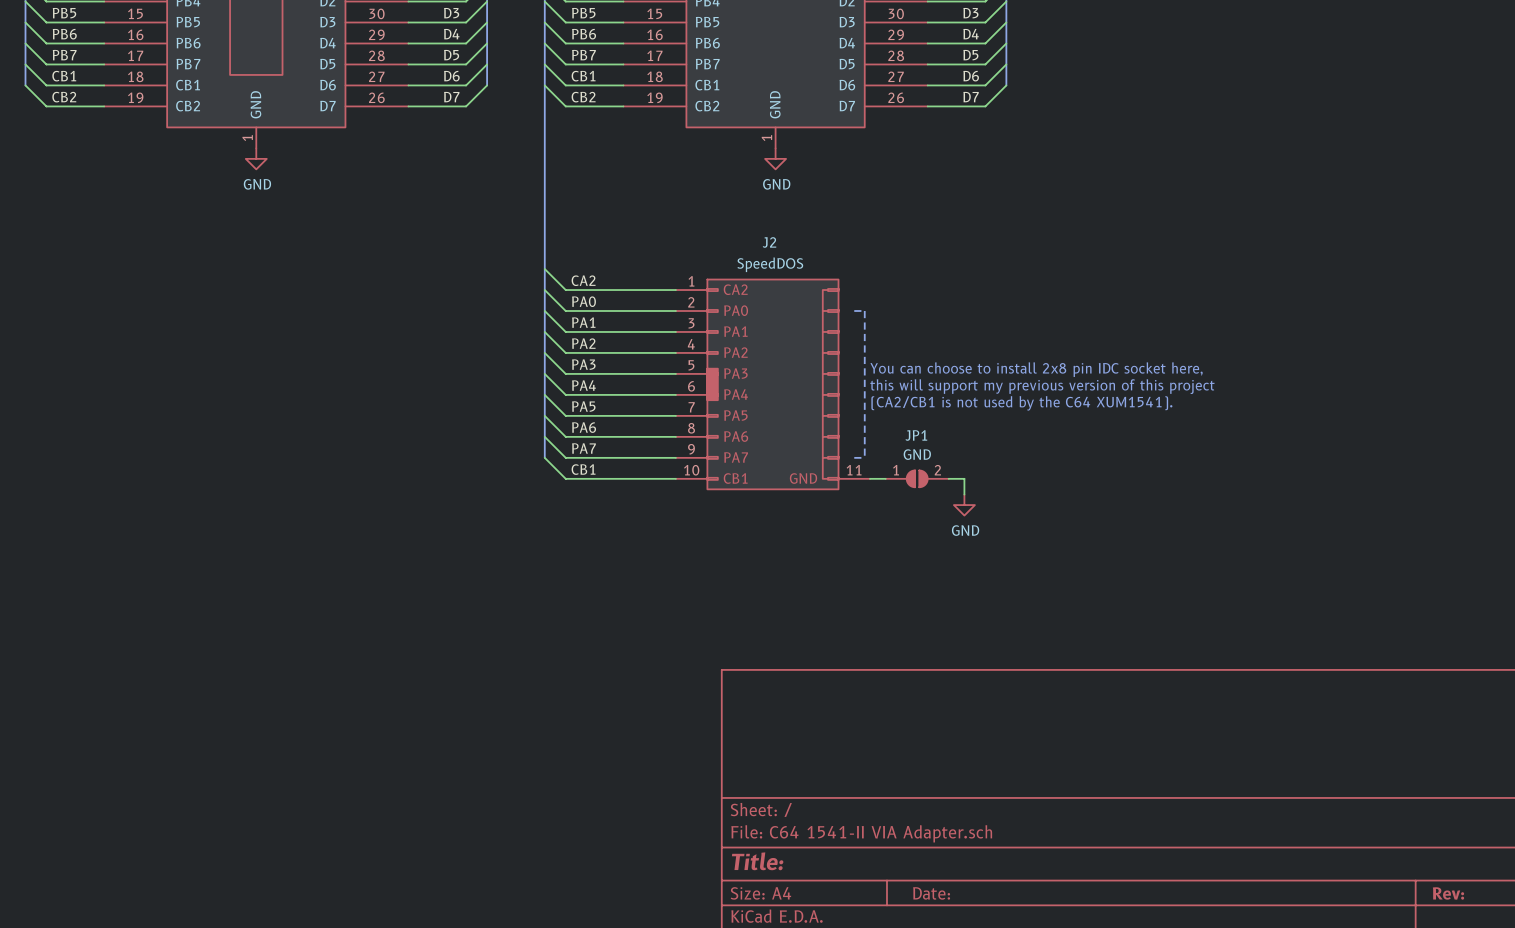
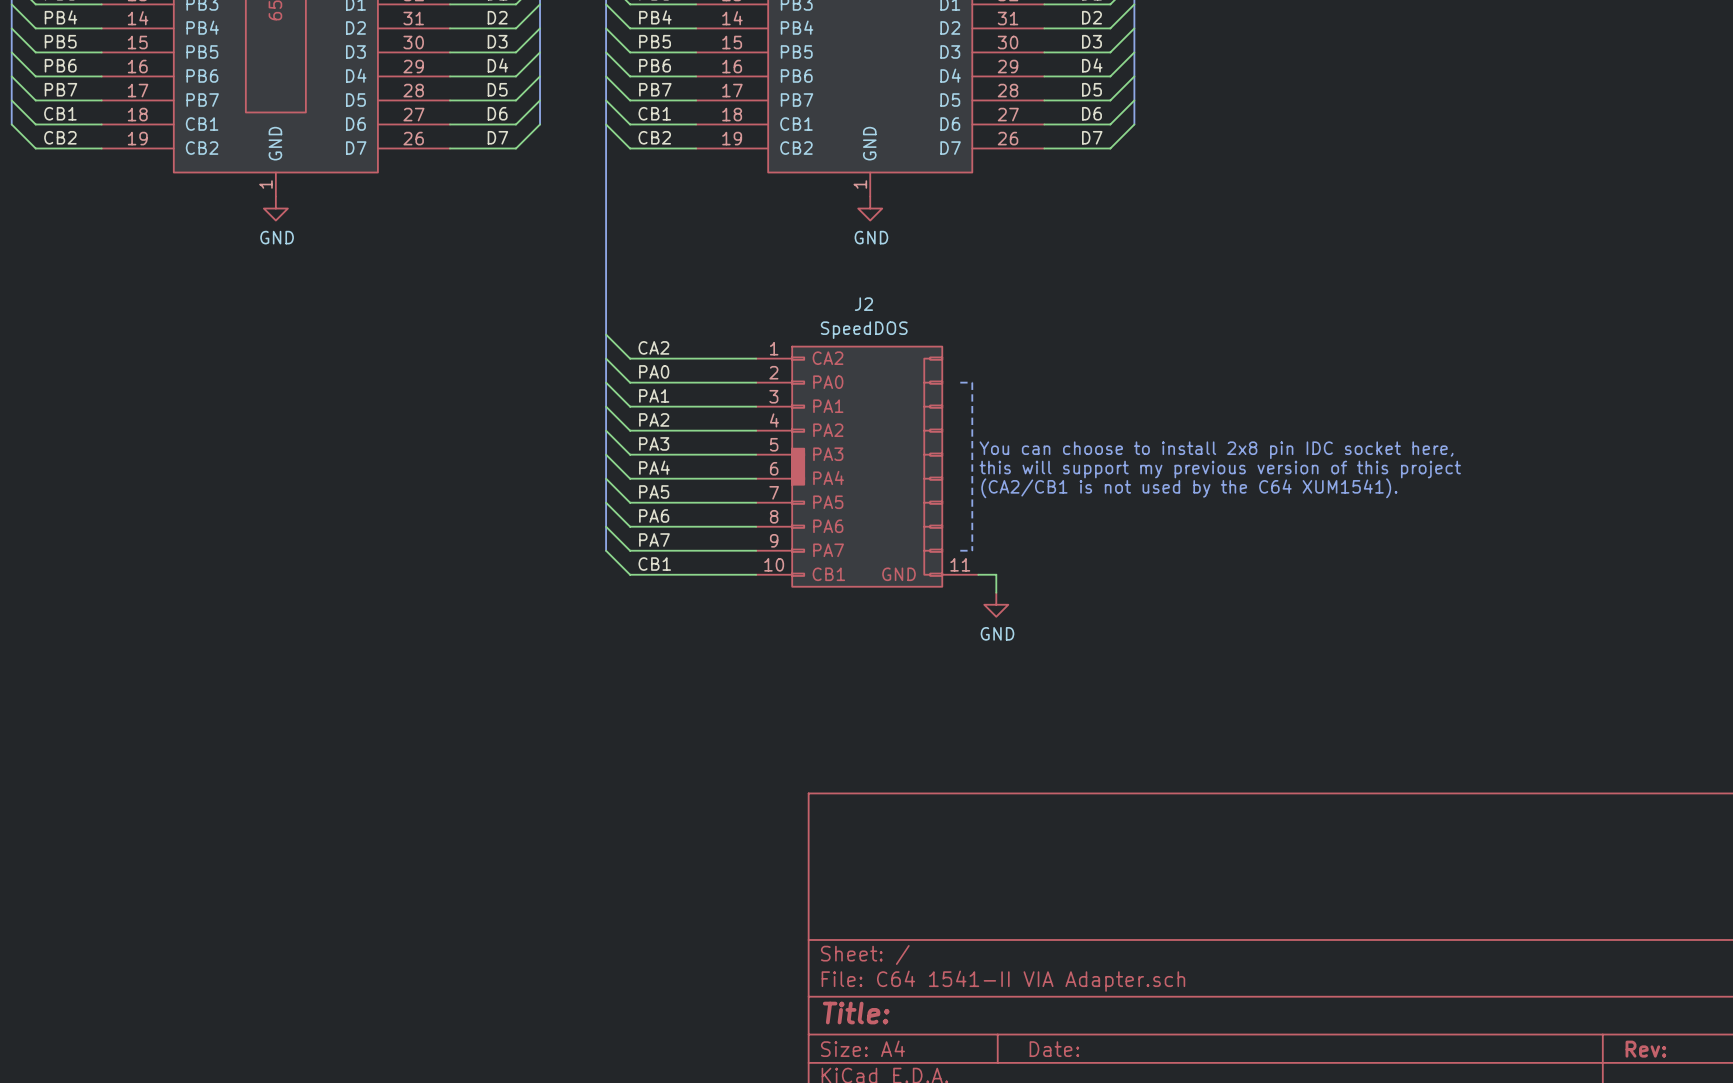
wire: none -> (996, 574) (996, 592)
JP1: GND (917, 478) -> none
wire: (948, 478) (964, 478) (964, 494) -> none
power symbol position: GND (964, 505) -> GND (996, 604)

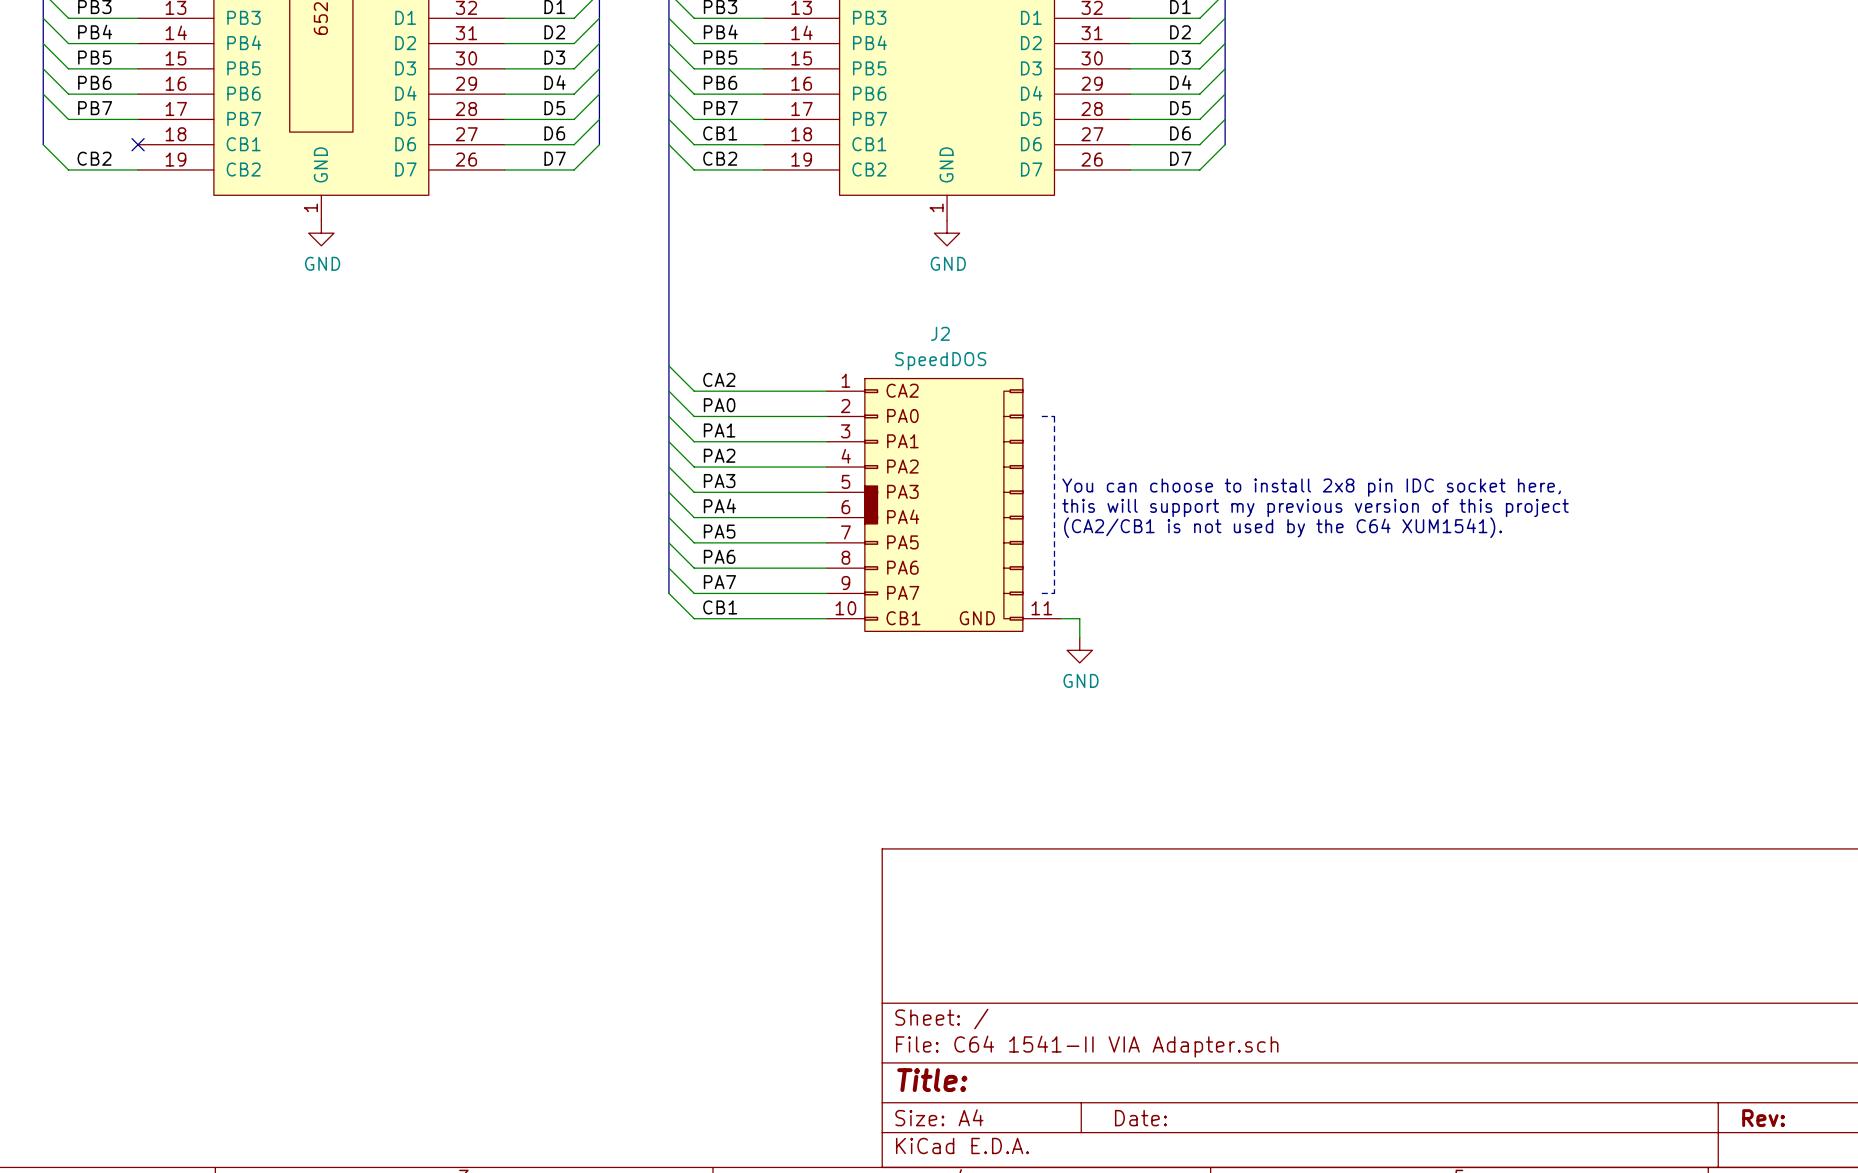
wire: (11, 100) (35, 124) (101, 124) -> none
label: CB1 (60, 113) -> none
no-connect mark: none -> (138, 144)

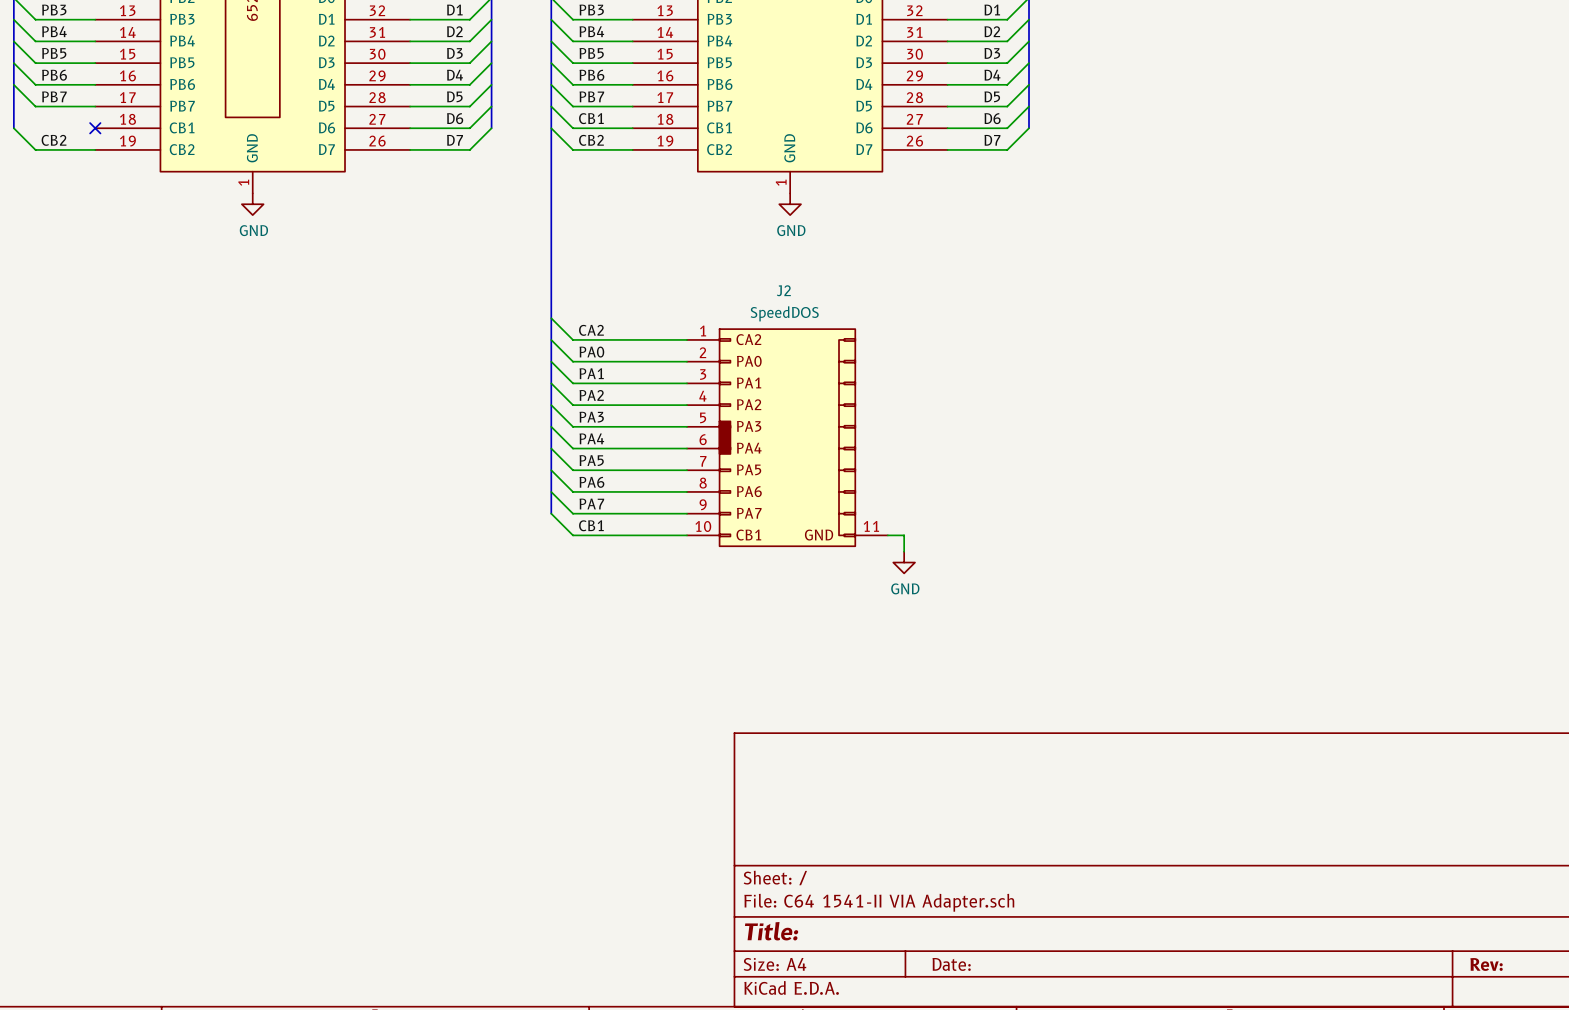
line: (1041, 416) (1054, 416) (1054, 593) (1041, 593) -> none
text: You can choose to install 2x8 pin IDC socket here, (1311, 487) -> none
text: this will support my previous version of this project (1315, 507) -> none
text: (CA2/CB1 is not used by the C64 XUM1541). (1283, 527) -> none

